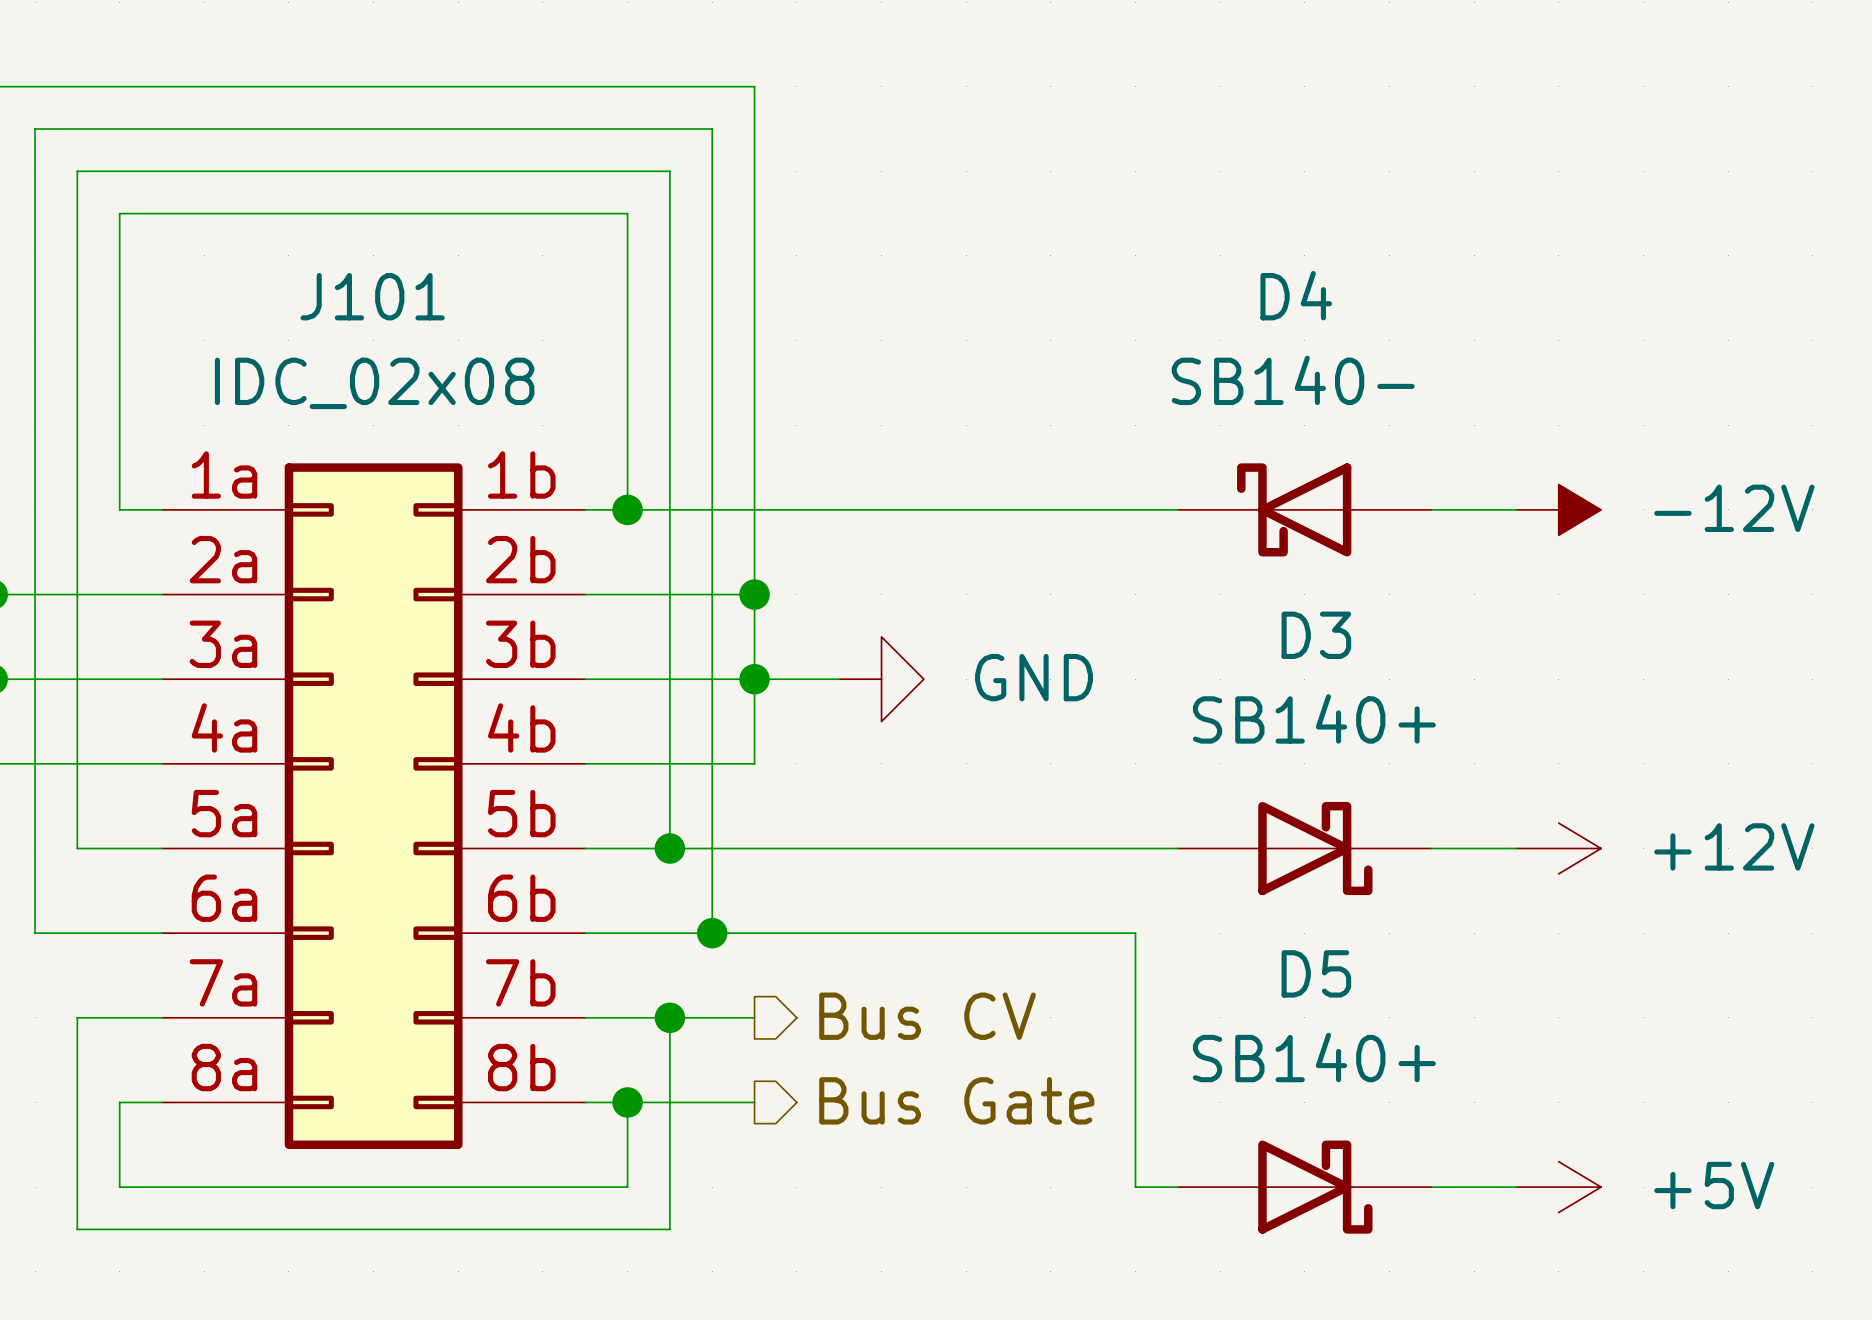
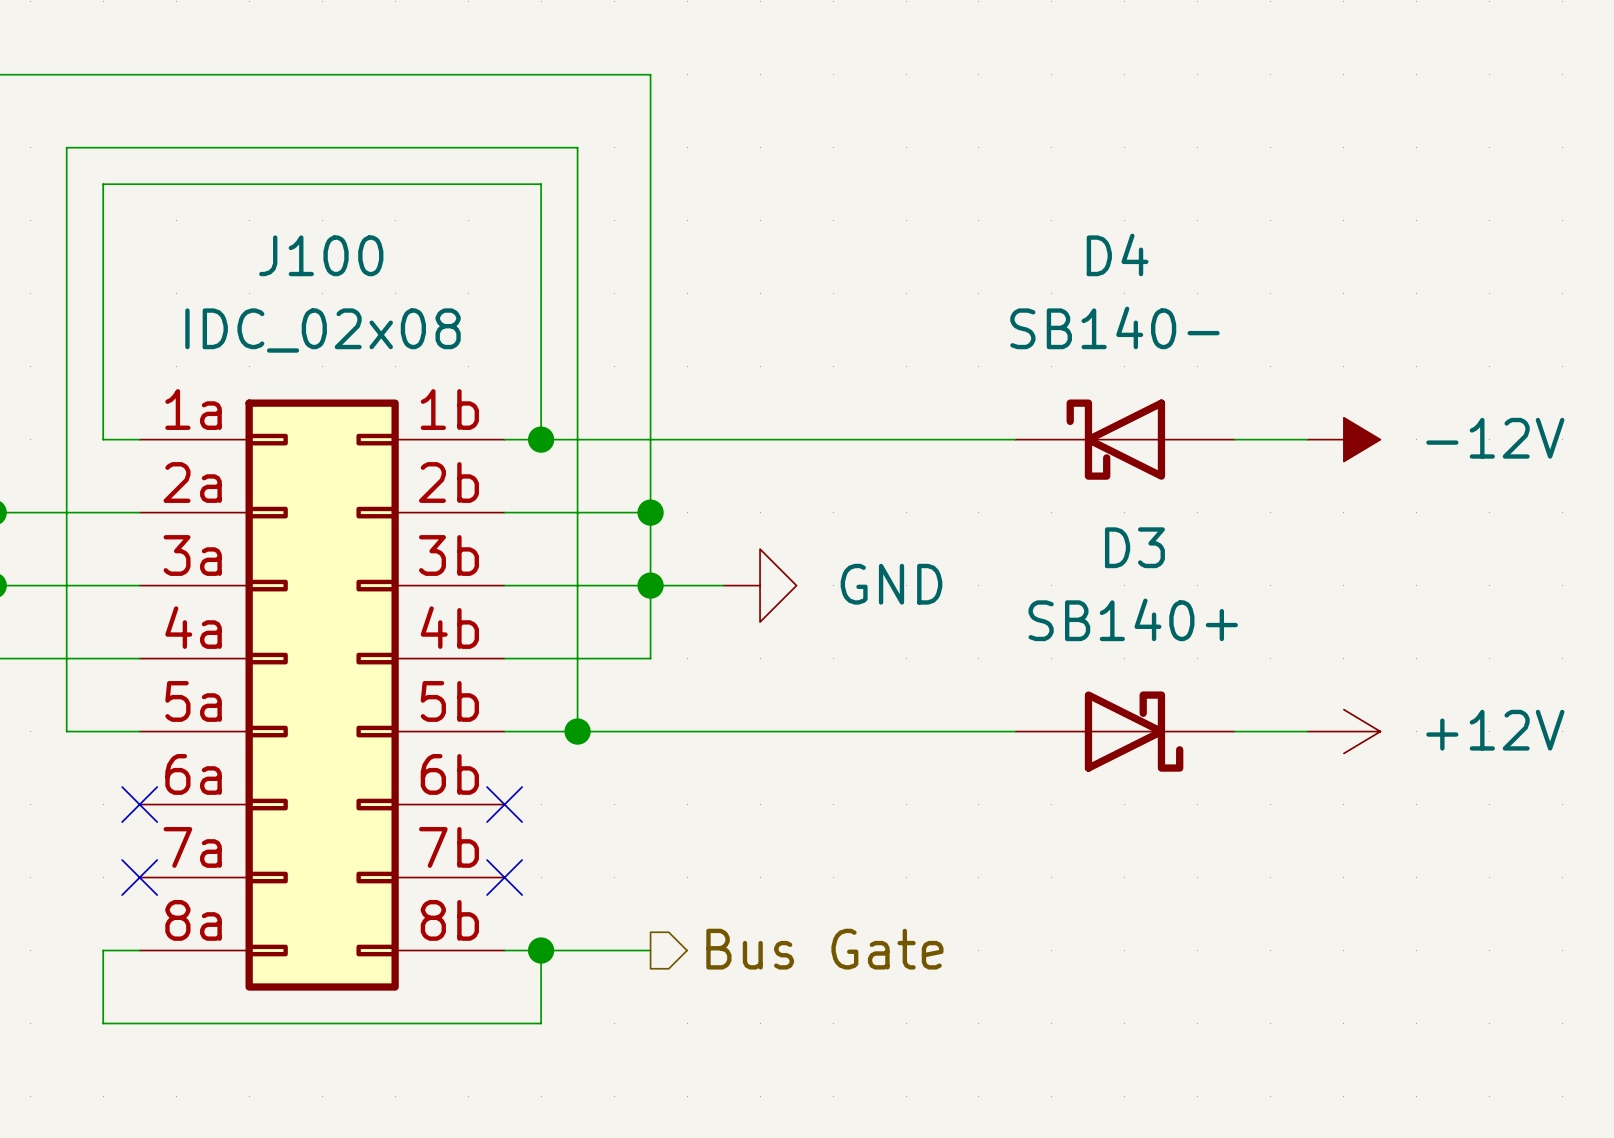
J101 name: J101 (372, 296) -> J100 (321, 255)
wire: (162, 933) (35, 933) (35, 128) (712, 128) (712, 933) -> none
no-connect mark: none -> (139, 804)
wire: (585, 933) (1135, 933) (1135, 1187) (1177, 1187) -> none
no-connect mark: none -> (504, 804)
junction: (712, 933) -> none
hierarchical label: Bus CV (927, 1016) -> none
wire: (162, 1017) (77, 1017) (77, 1229) (669, 1229) (669, 1017) -> none
no-connect mark: none -> (139, 877)
wire: (585, 1017) (754, 1017) -> none
no-connect mark: none -> (504, 877)
junction: (669, 1017) -> none
D5: SB140+ (1304, 1187) -> none
wire: (1431, 1187) (1516, 1187) -> none
power symbol: +5V (1558, 1187) -> none

